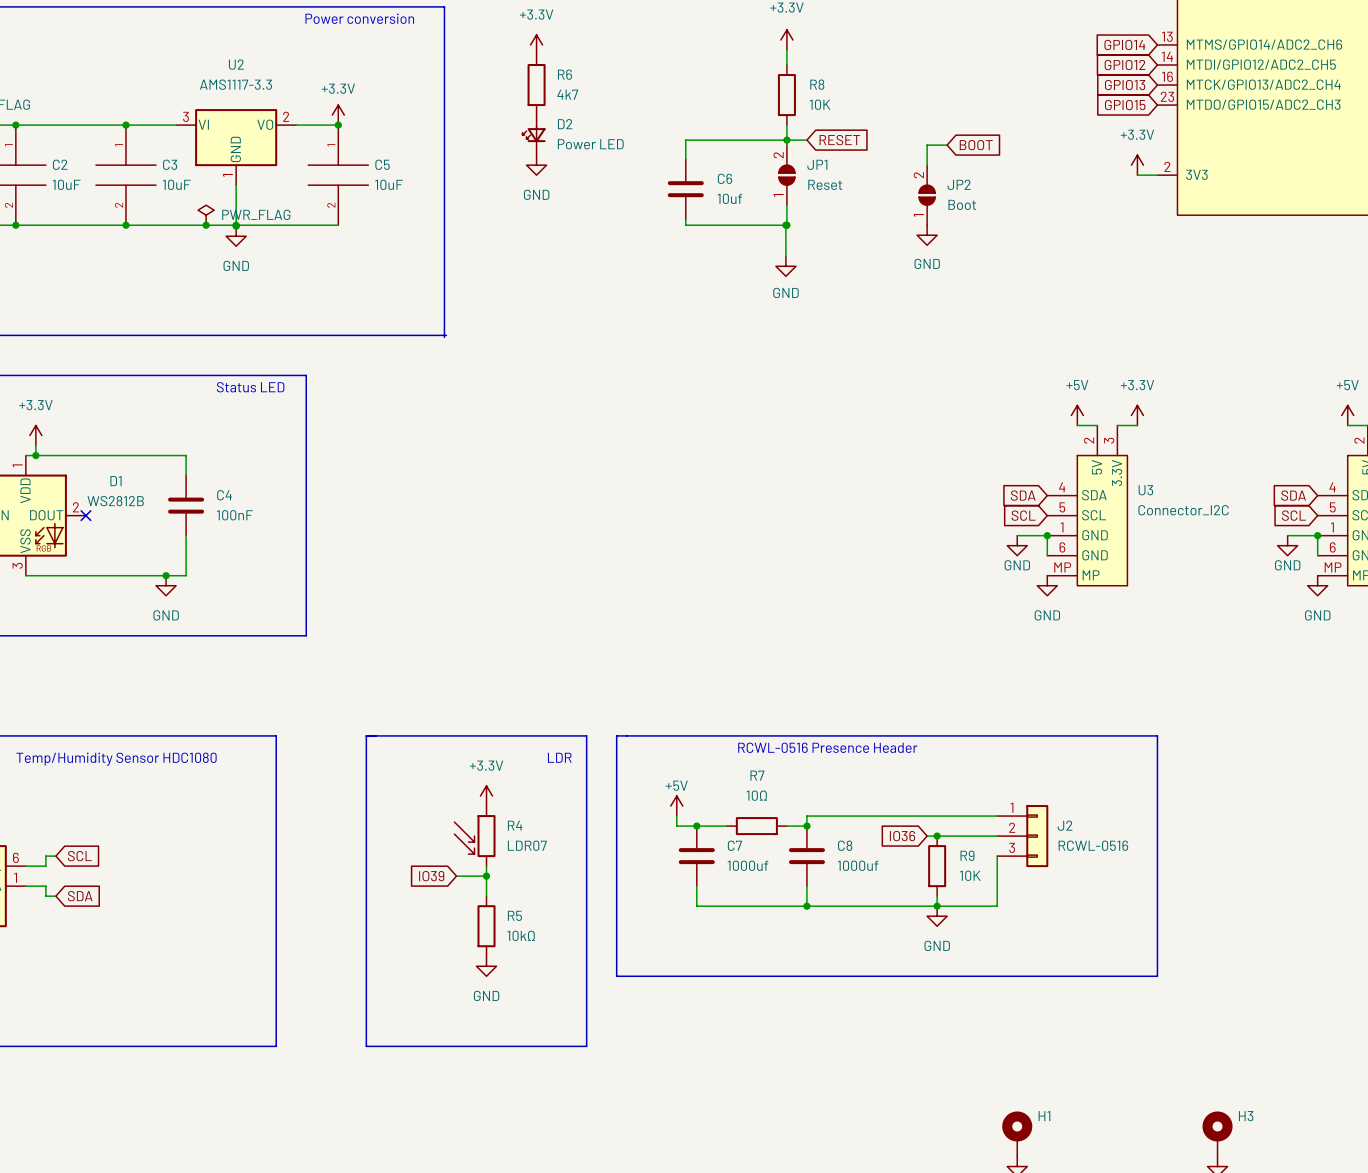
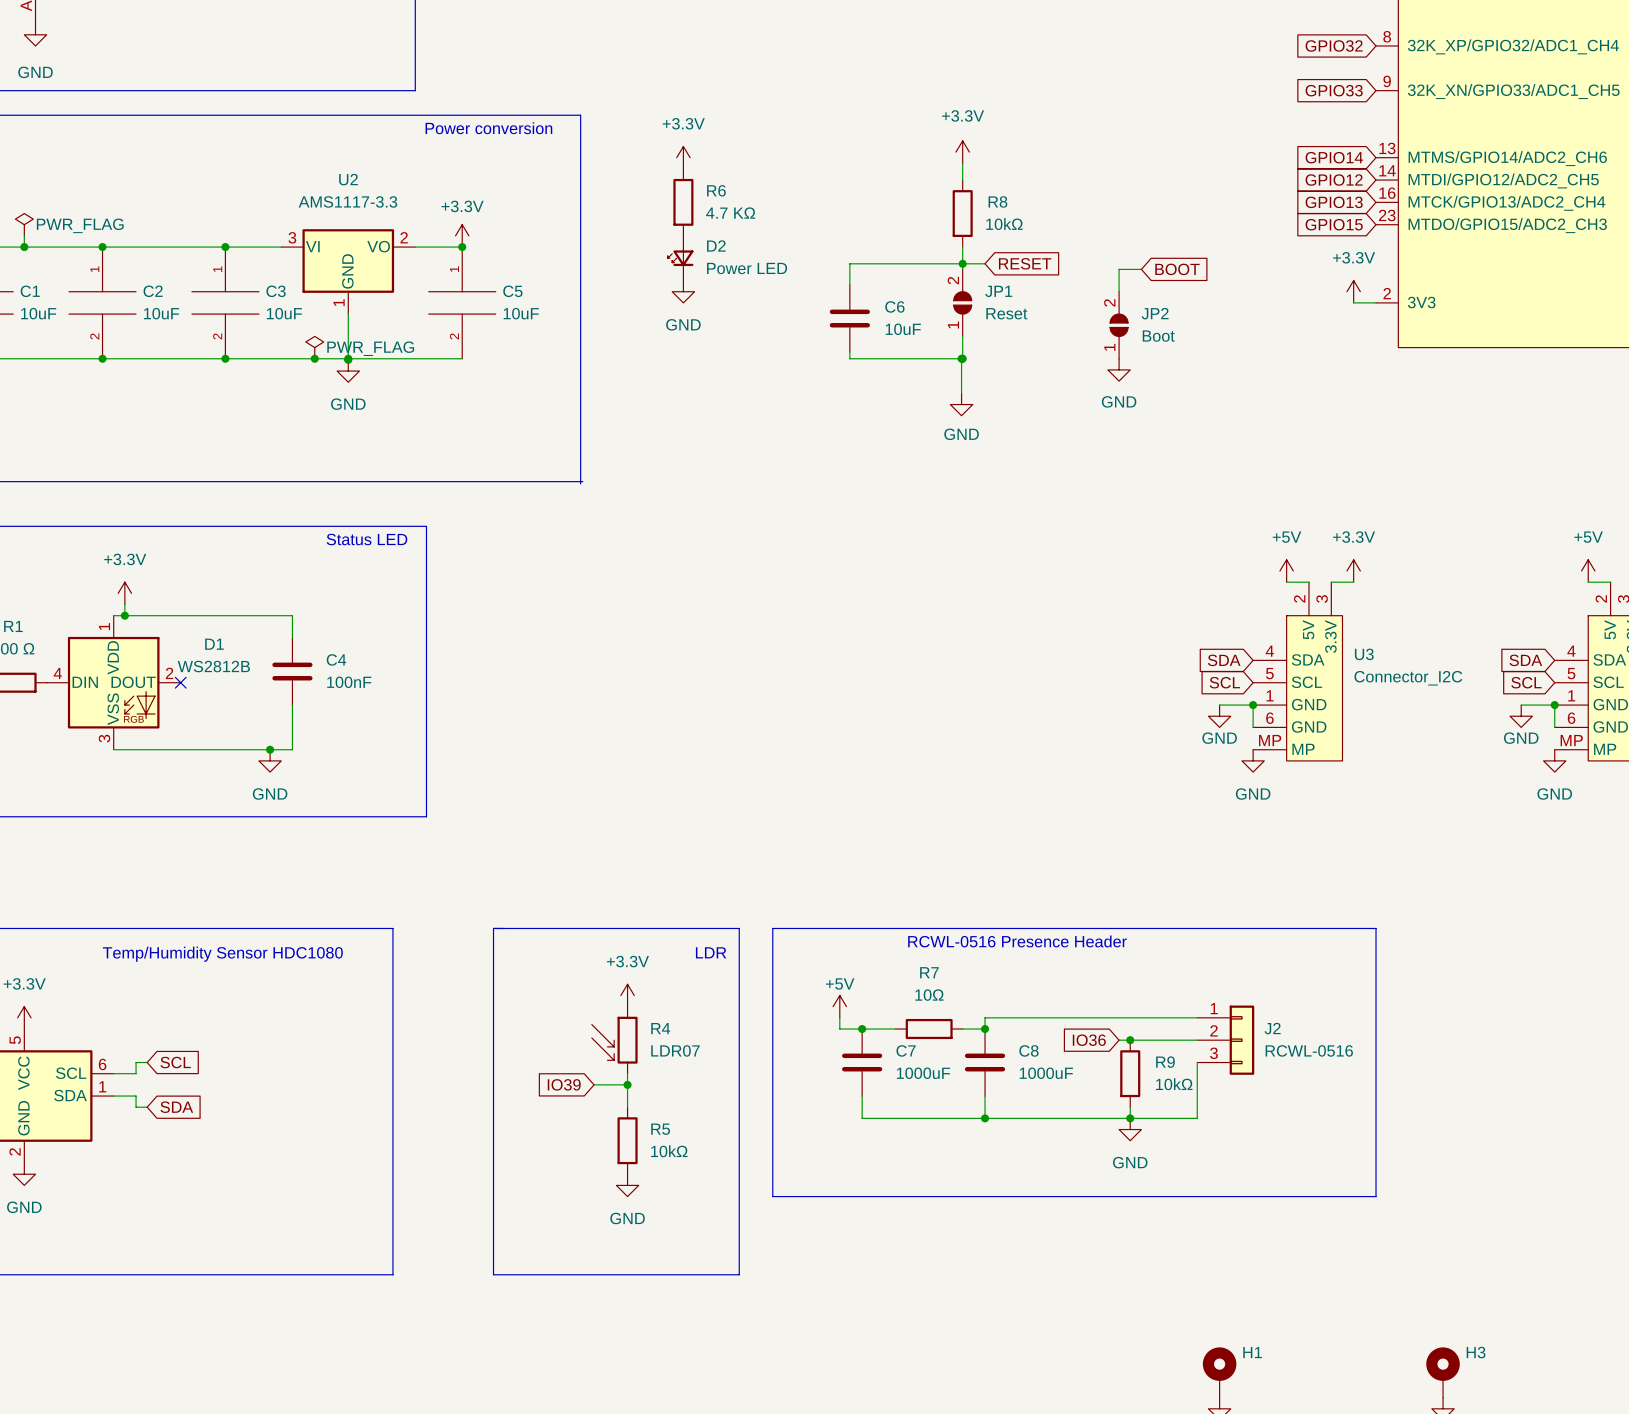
R6 value: 4k7 (567, 94) -> 4.7 KΩ (730, 213)
R8 value: 10K (820, 104) -> 10kΩ (1004, 224)
C6 value: 10uf (729, 198) -> 10uF (903, 329)
C7 value: 1000uf (747, 865) -> 1000uF (923, 1073)
C8 value: 1000uf (858, 865) -> 1000uF (1046, 1073)
R9 value: 10K (970, 875) -> 10kΩ (1174, 1084)

